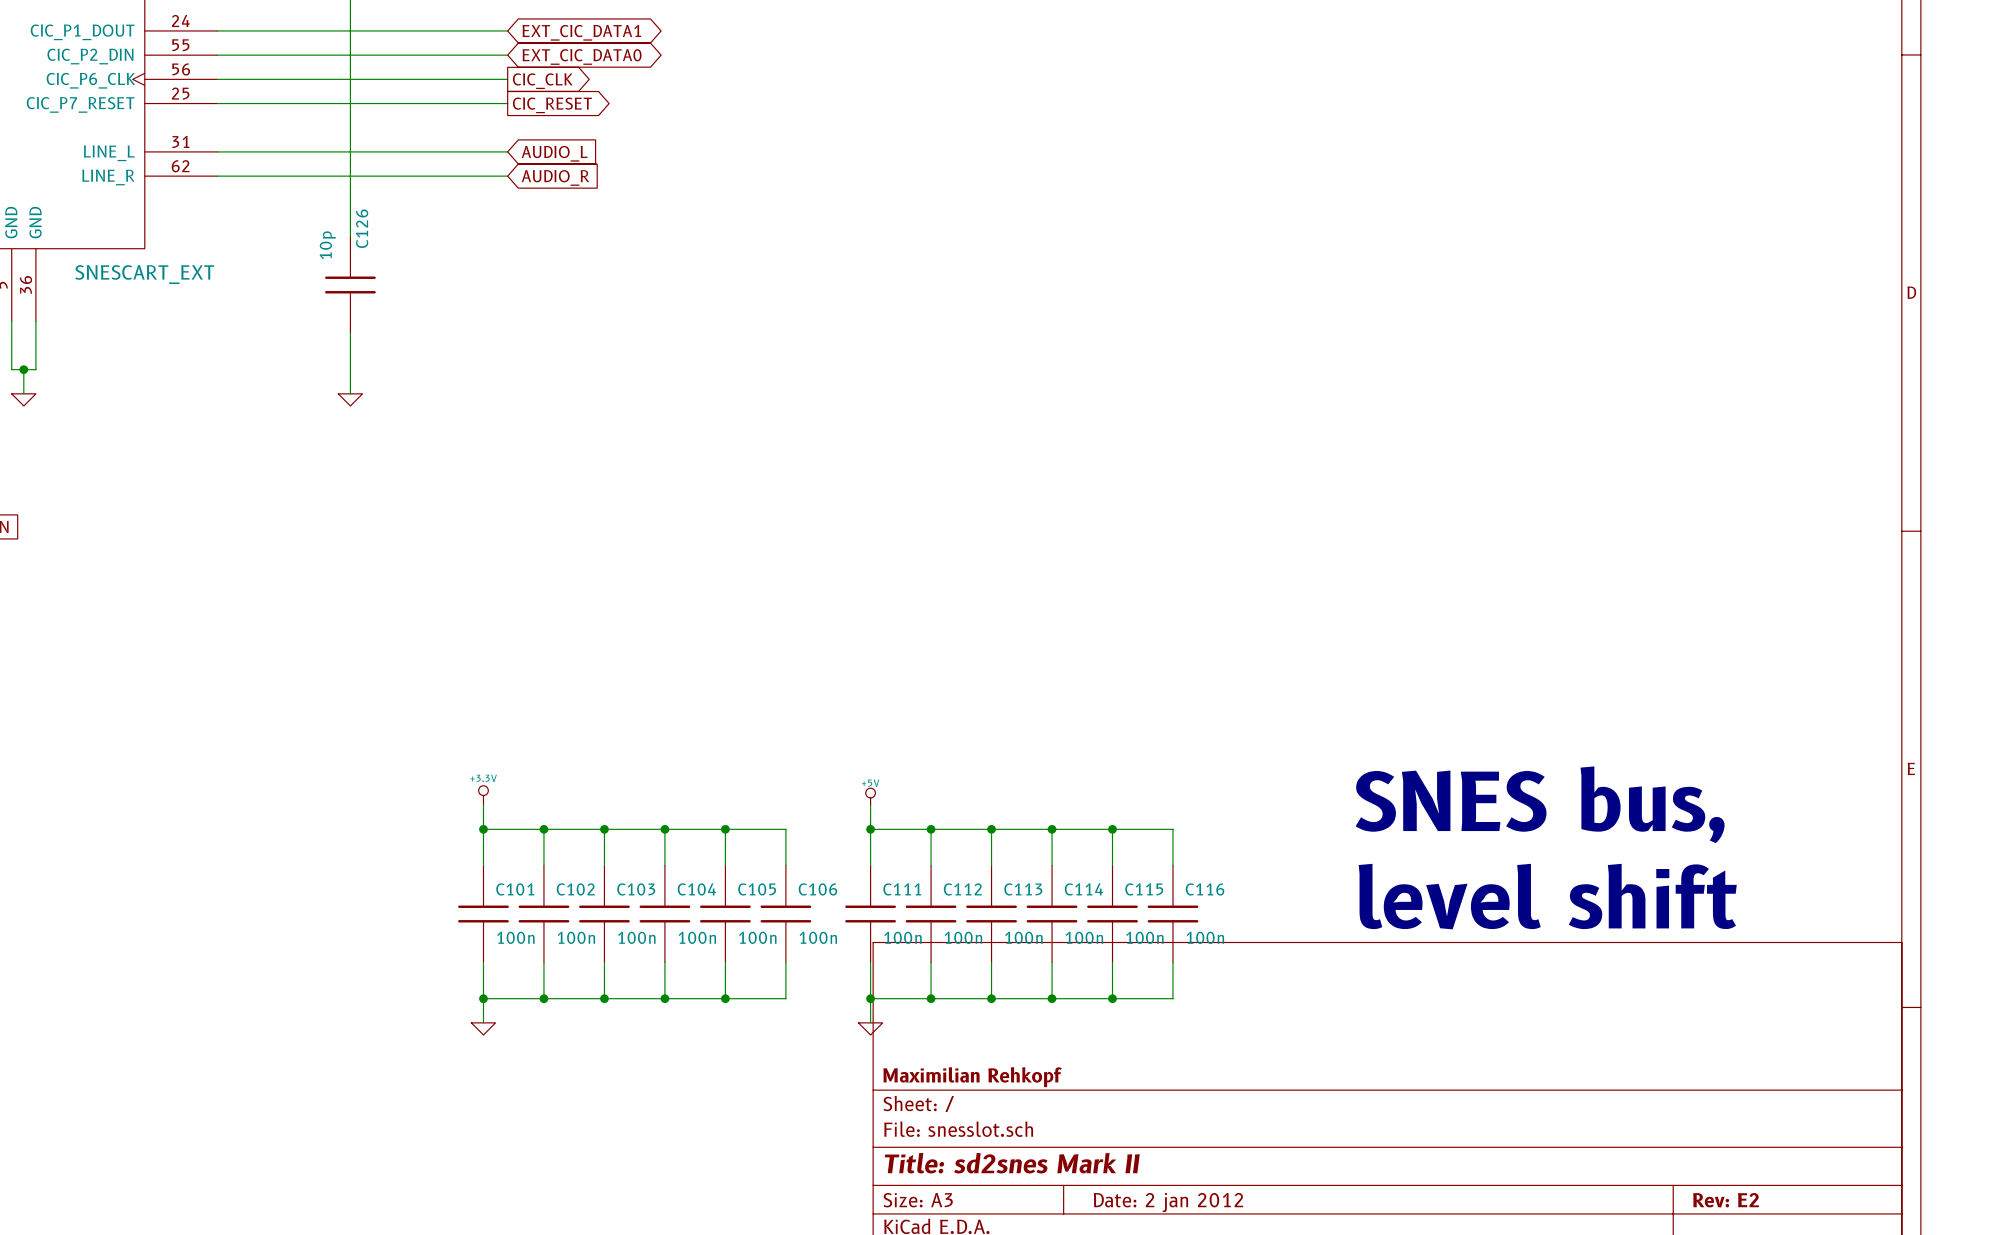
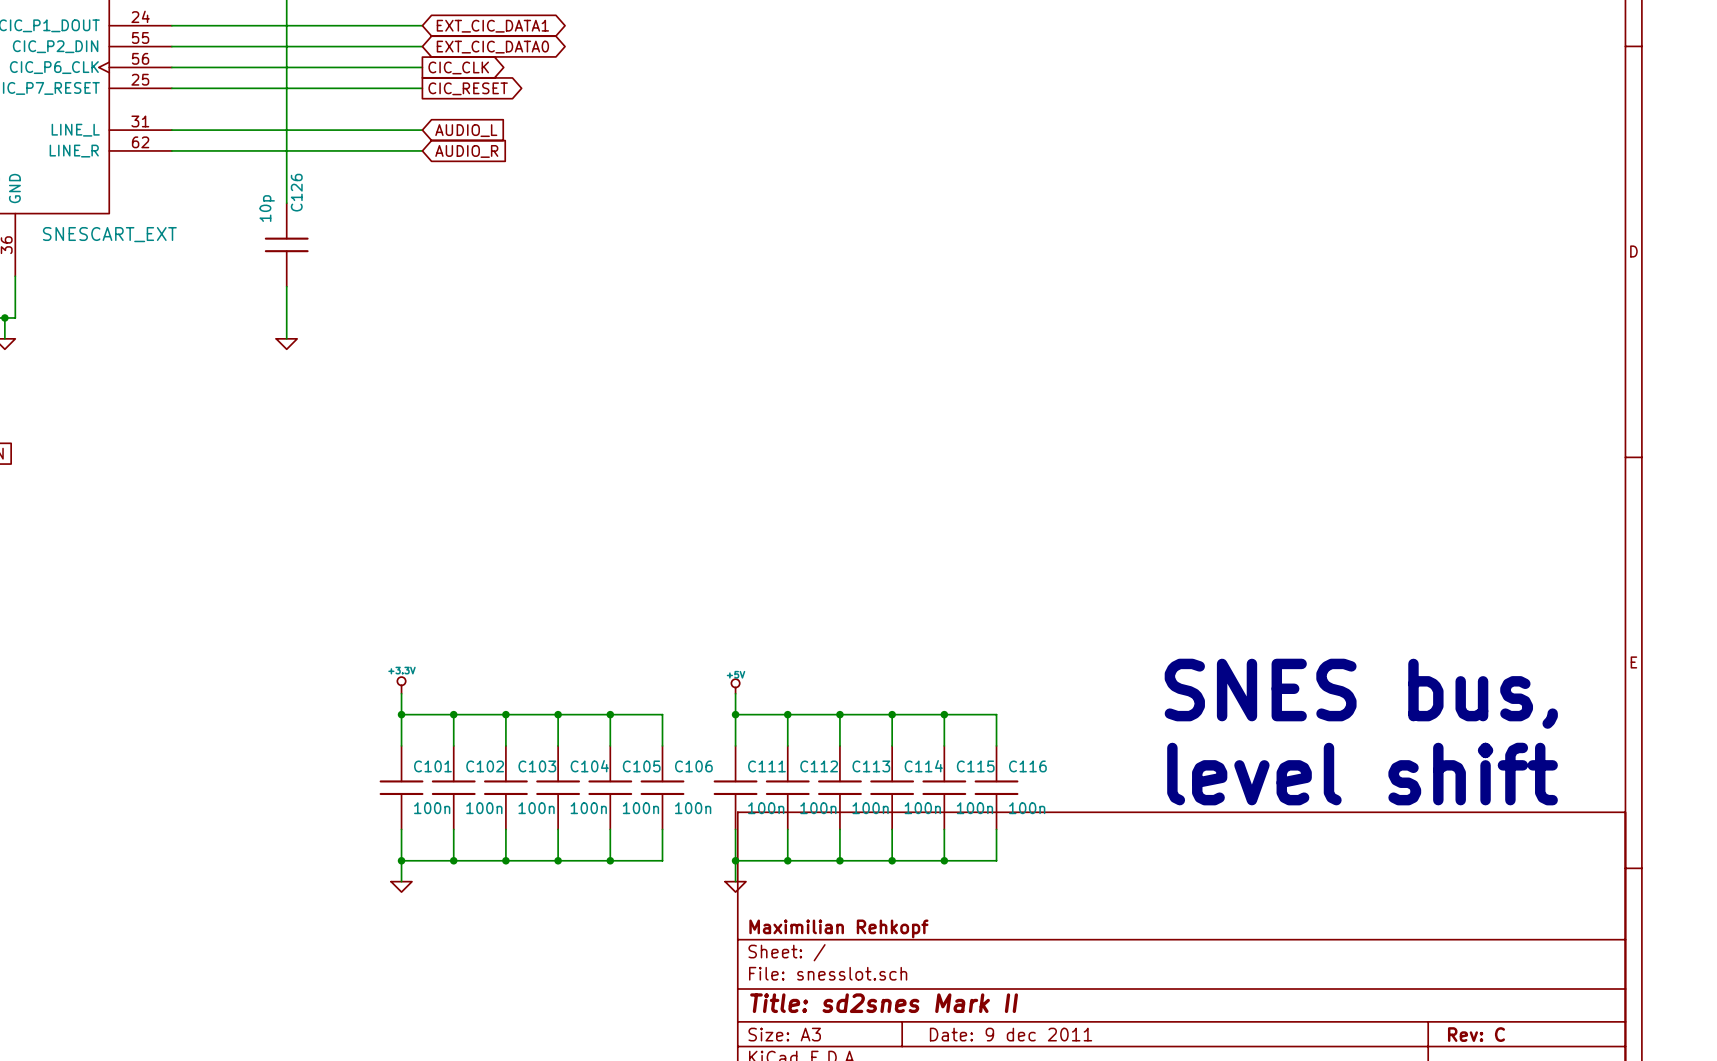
title block: Rev: E2 (1725, 1200) -> Rev: C (1476, 1034)
title block: Date: 2 jan 2012 (1168, 1202) -> Date: 9 dec 2011 (1011, 1034)

